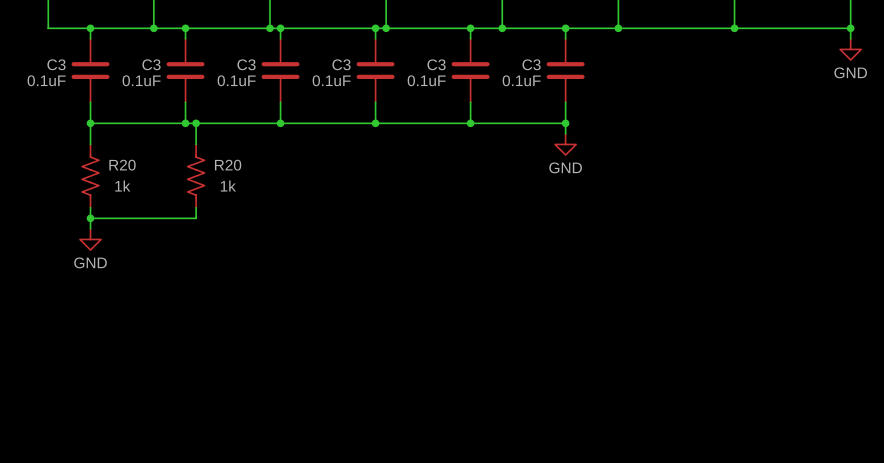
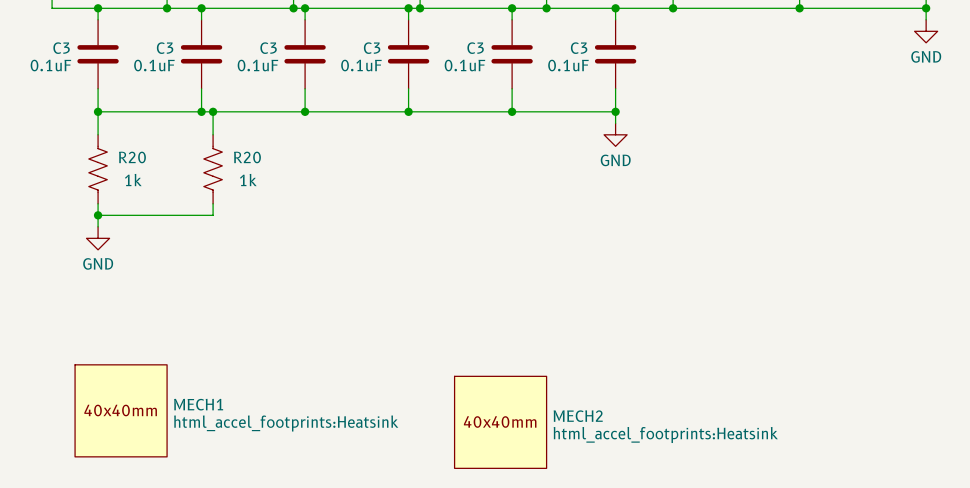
MECH1: none -> (121, 410)
MECH2: none -> (500, 422)

